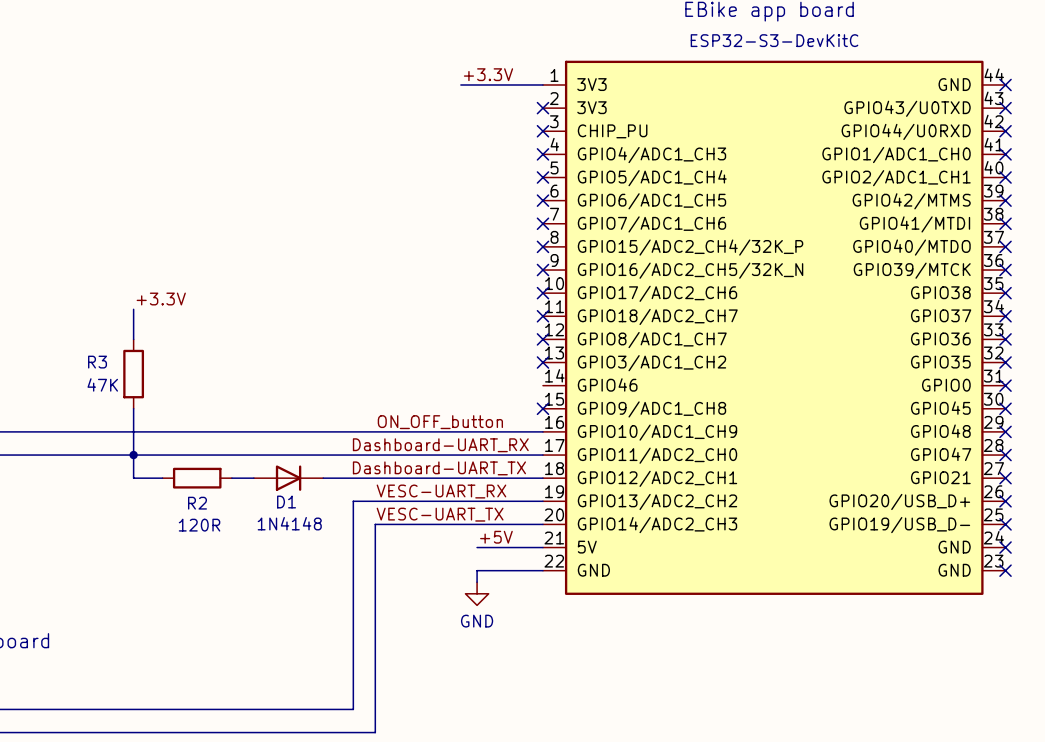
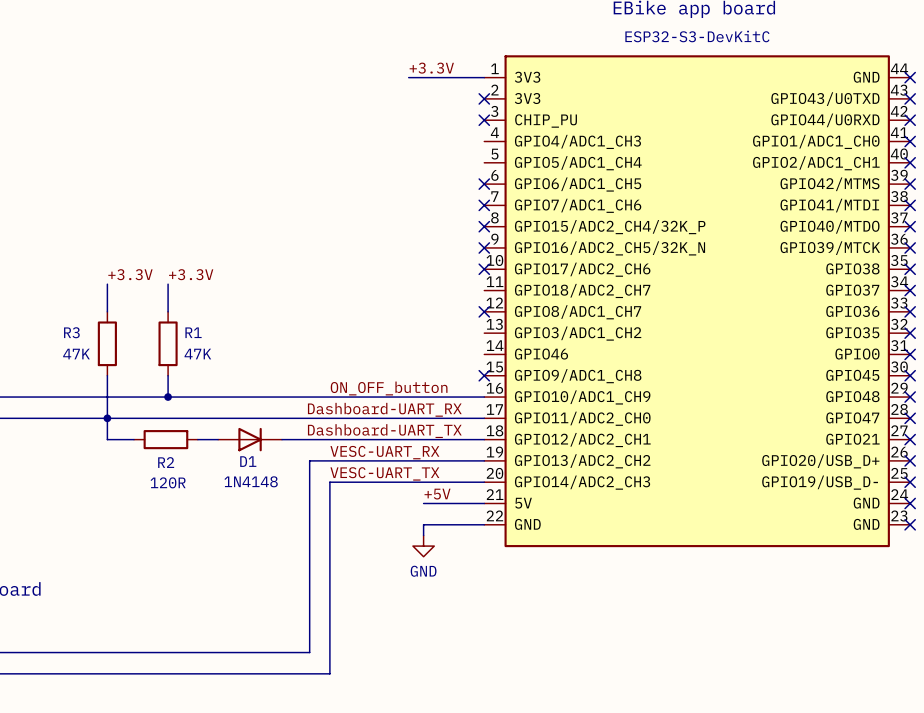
no-connect mark: (542, 154) -> none
no-connect mark: (542, 177) -> none
label: none -> +3.3V (191, 274)
wire: none -> (168, 284) (168, 311)
no-connect mark: (542, 316) -> none
no-connect mark: (542, 362) -> none
R1: none -> 47K (168, 343)
wire: none -> (168, 375) (168, 397)
junction: none -> (168, 397)

